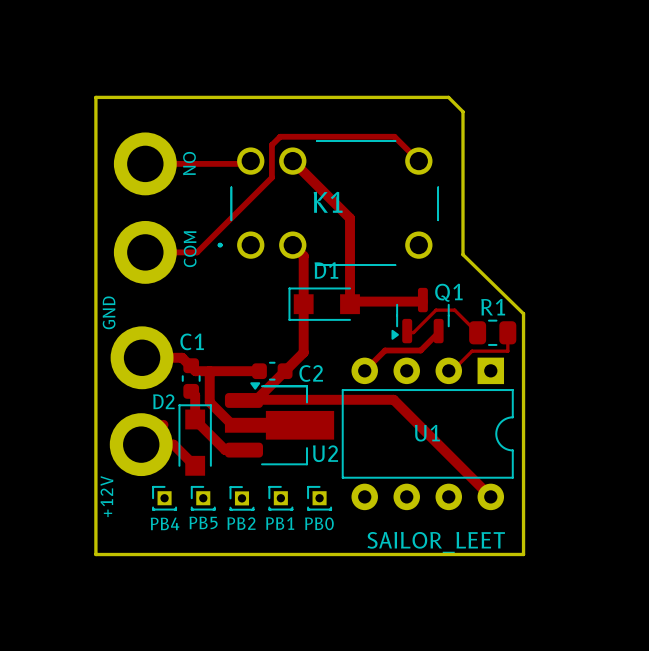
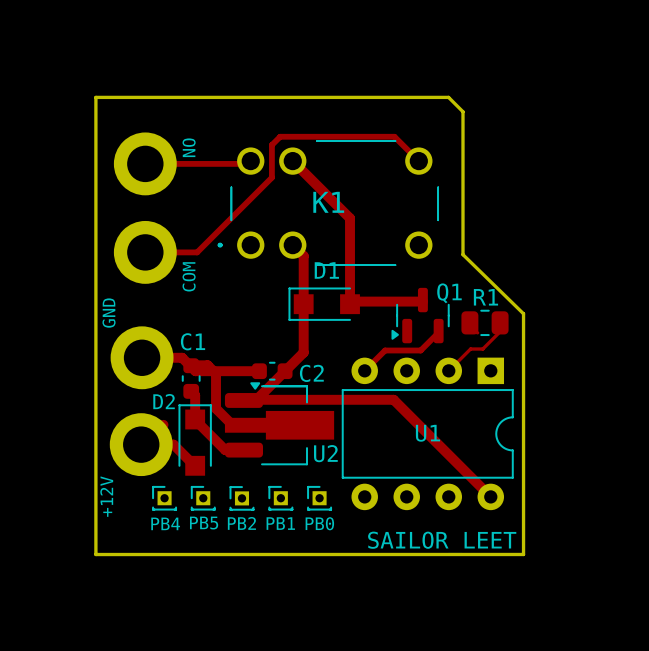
NO name position: NO (189, 163) -> NO (189, 147)
COM name position: COM (190, 249) -> COM (189, 276)
track: (407, 332) (413, 332) (436, 310) (454, 310) (477, 332) -> none
R1 position: (492, 332) -> (485, 322)
track: (507, 332) (507, 351) (472, 351) (452, 370) (448, 370) -> (500, 322) (500, 331) (482, 349) (470, 349) (448, 370)
track: (209, 371) (209, 402) (216, 408) -> (197, 365) (207, 365) (216, 373) (216, 408)

